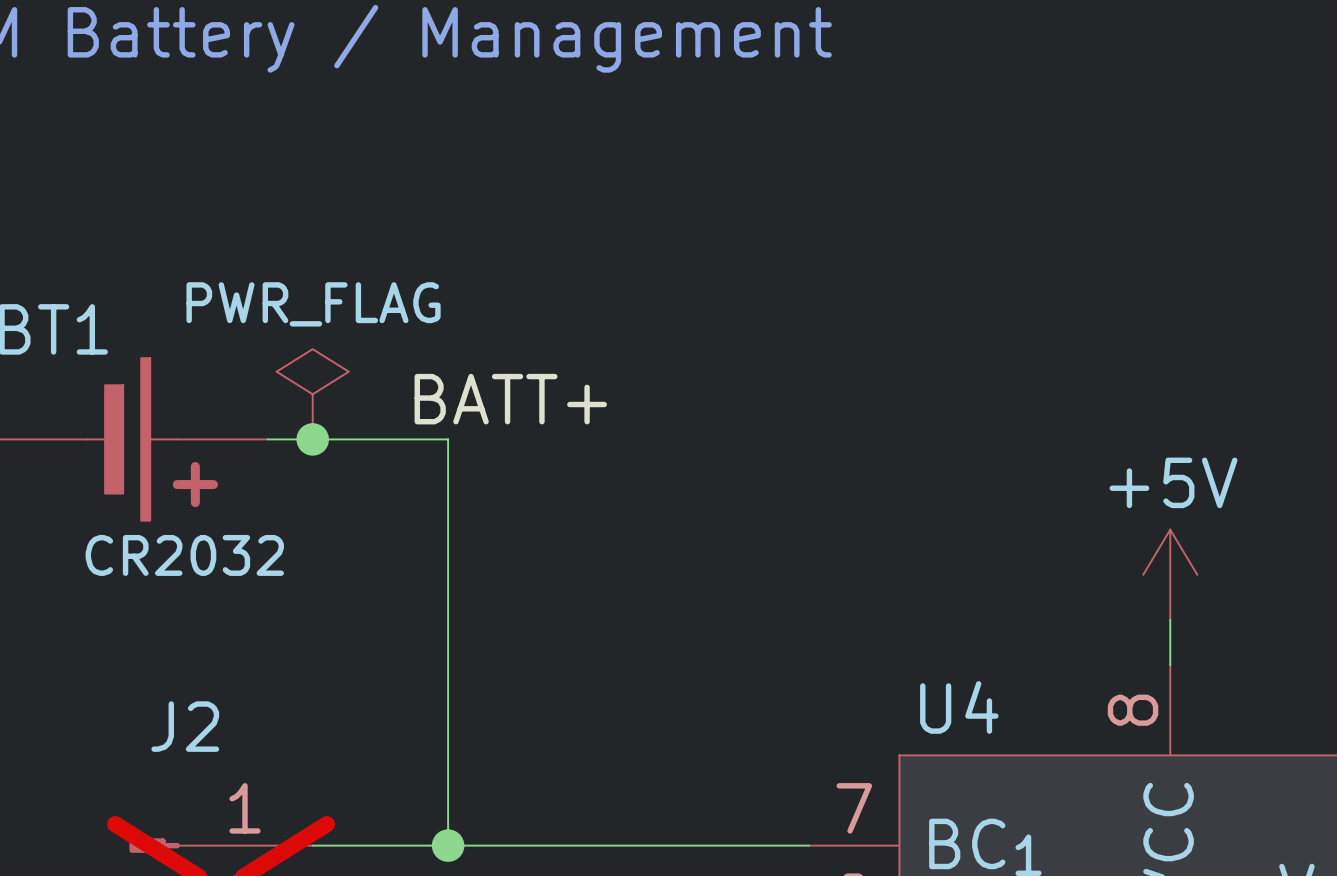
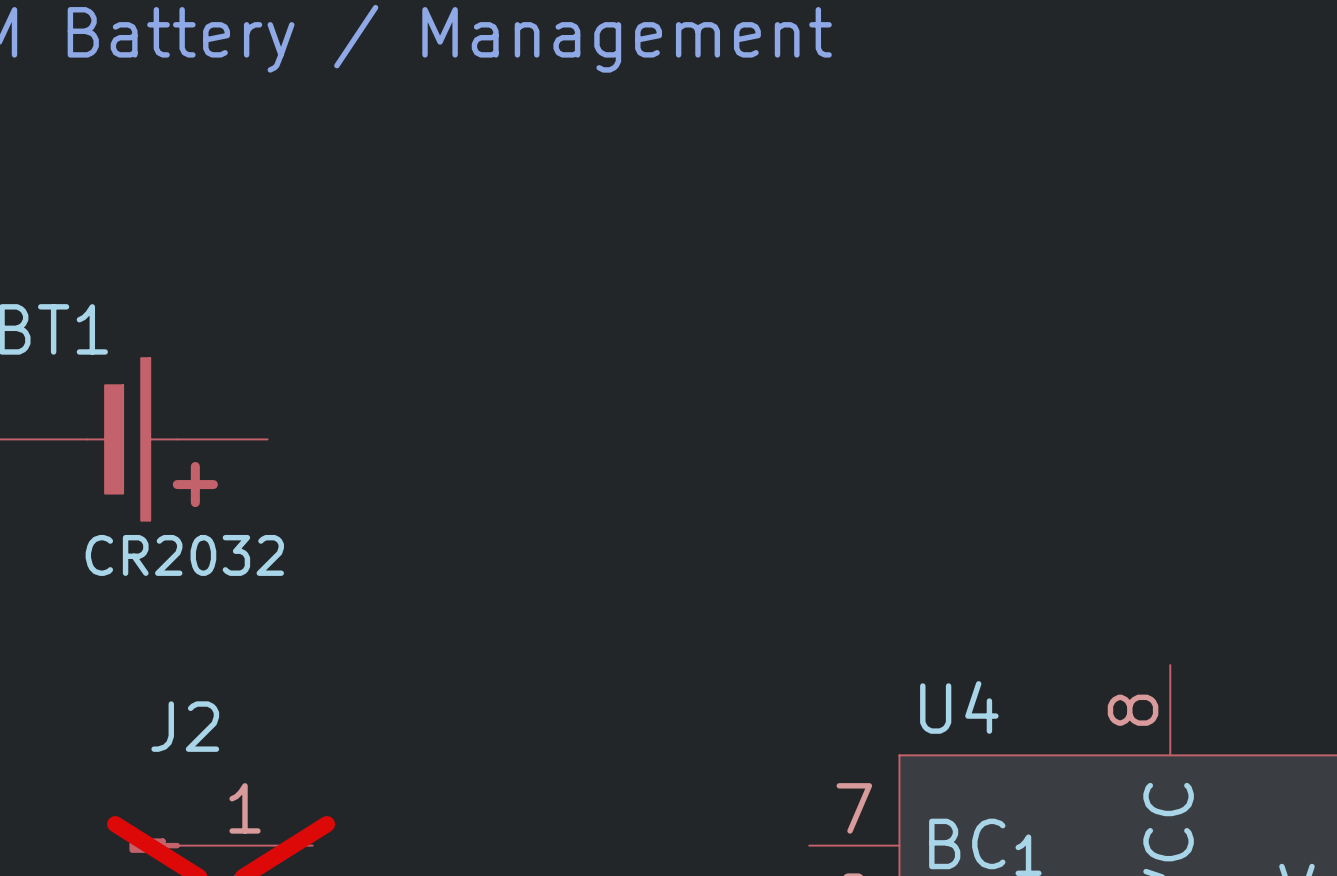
power symbol: PWR_FLAG (312, 394) -> none
label: BATT+ (510, 399) -> none
wire: (267, 439) (448, 439) (448, 845) -> none
junction: (312, 439) -> none
power symbol: +5V (1170, 574) -> none
wire: (1170, 619) (1170, 665) -> none
wire: (312, 845) (809, 845) -> none
junction: (448, 845) -> none

